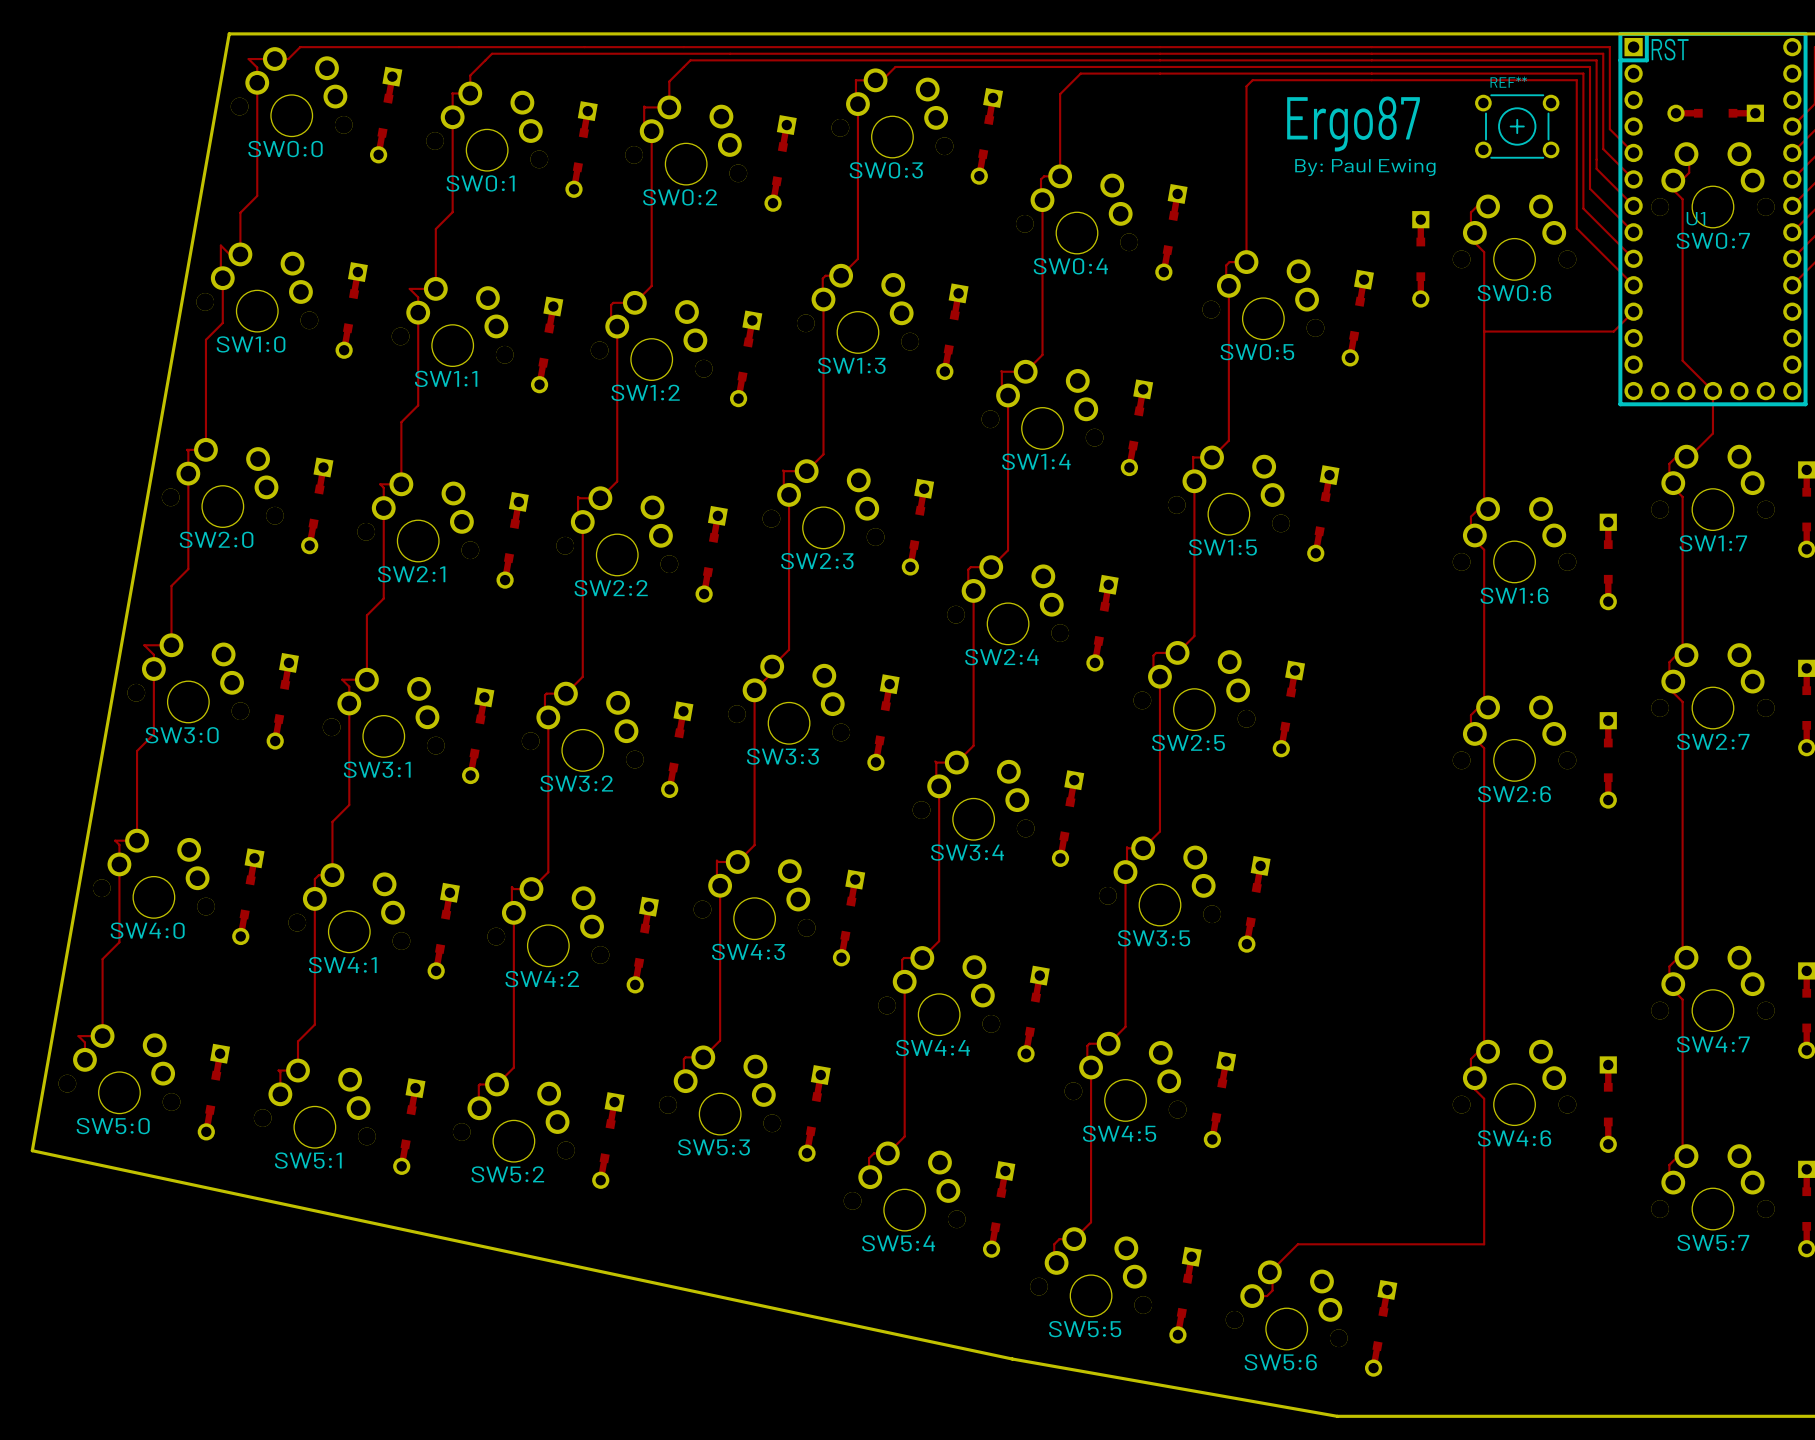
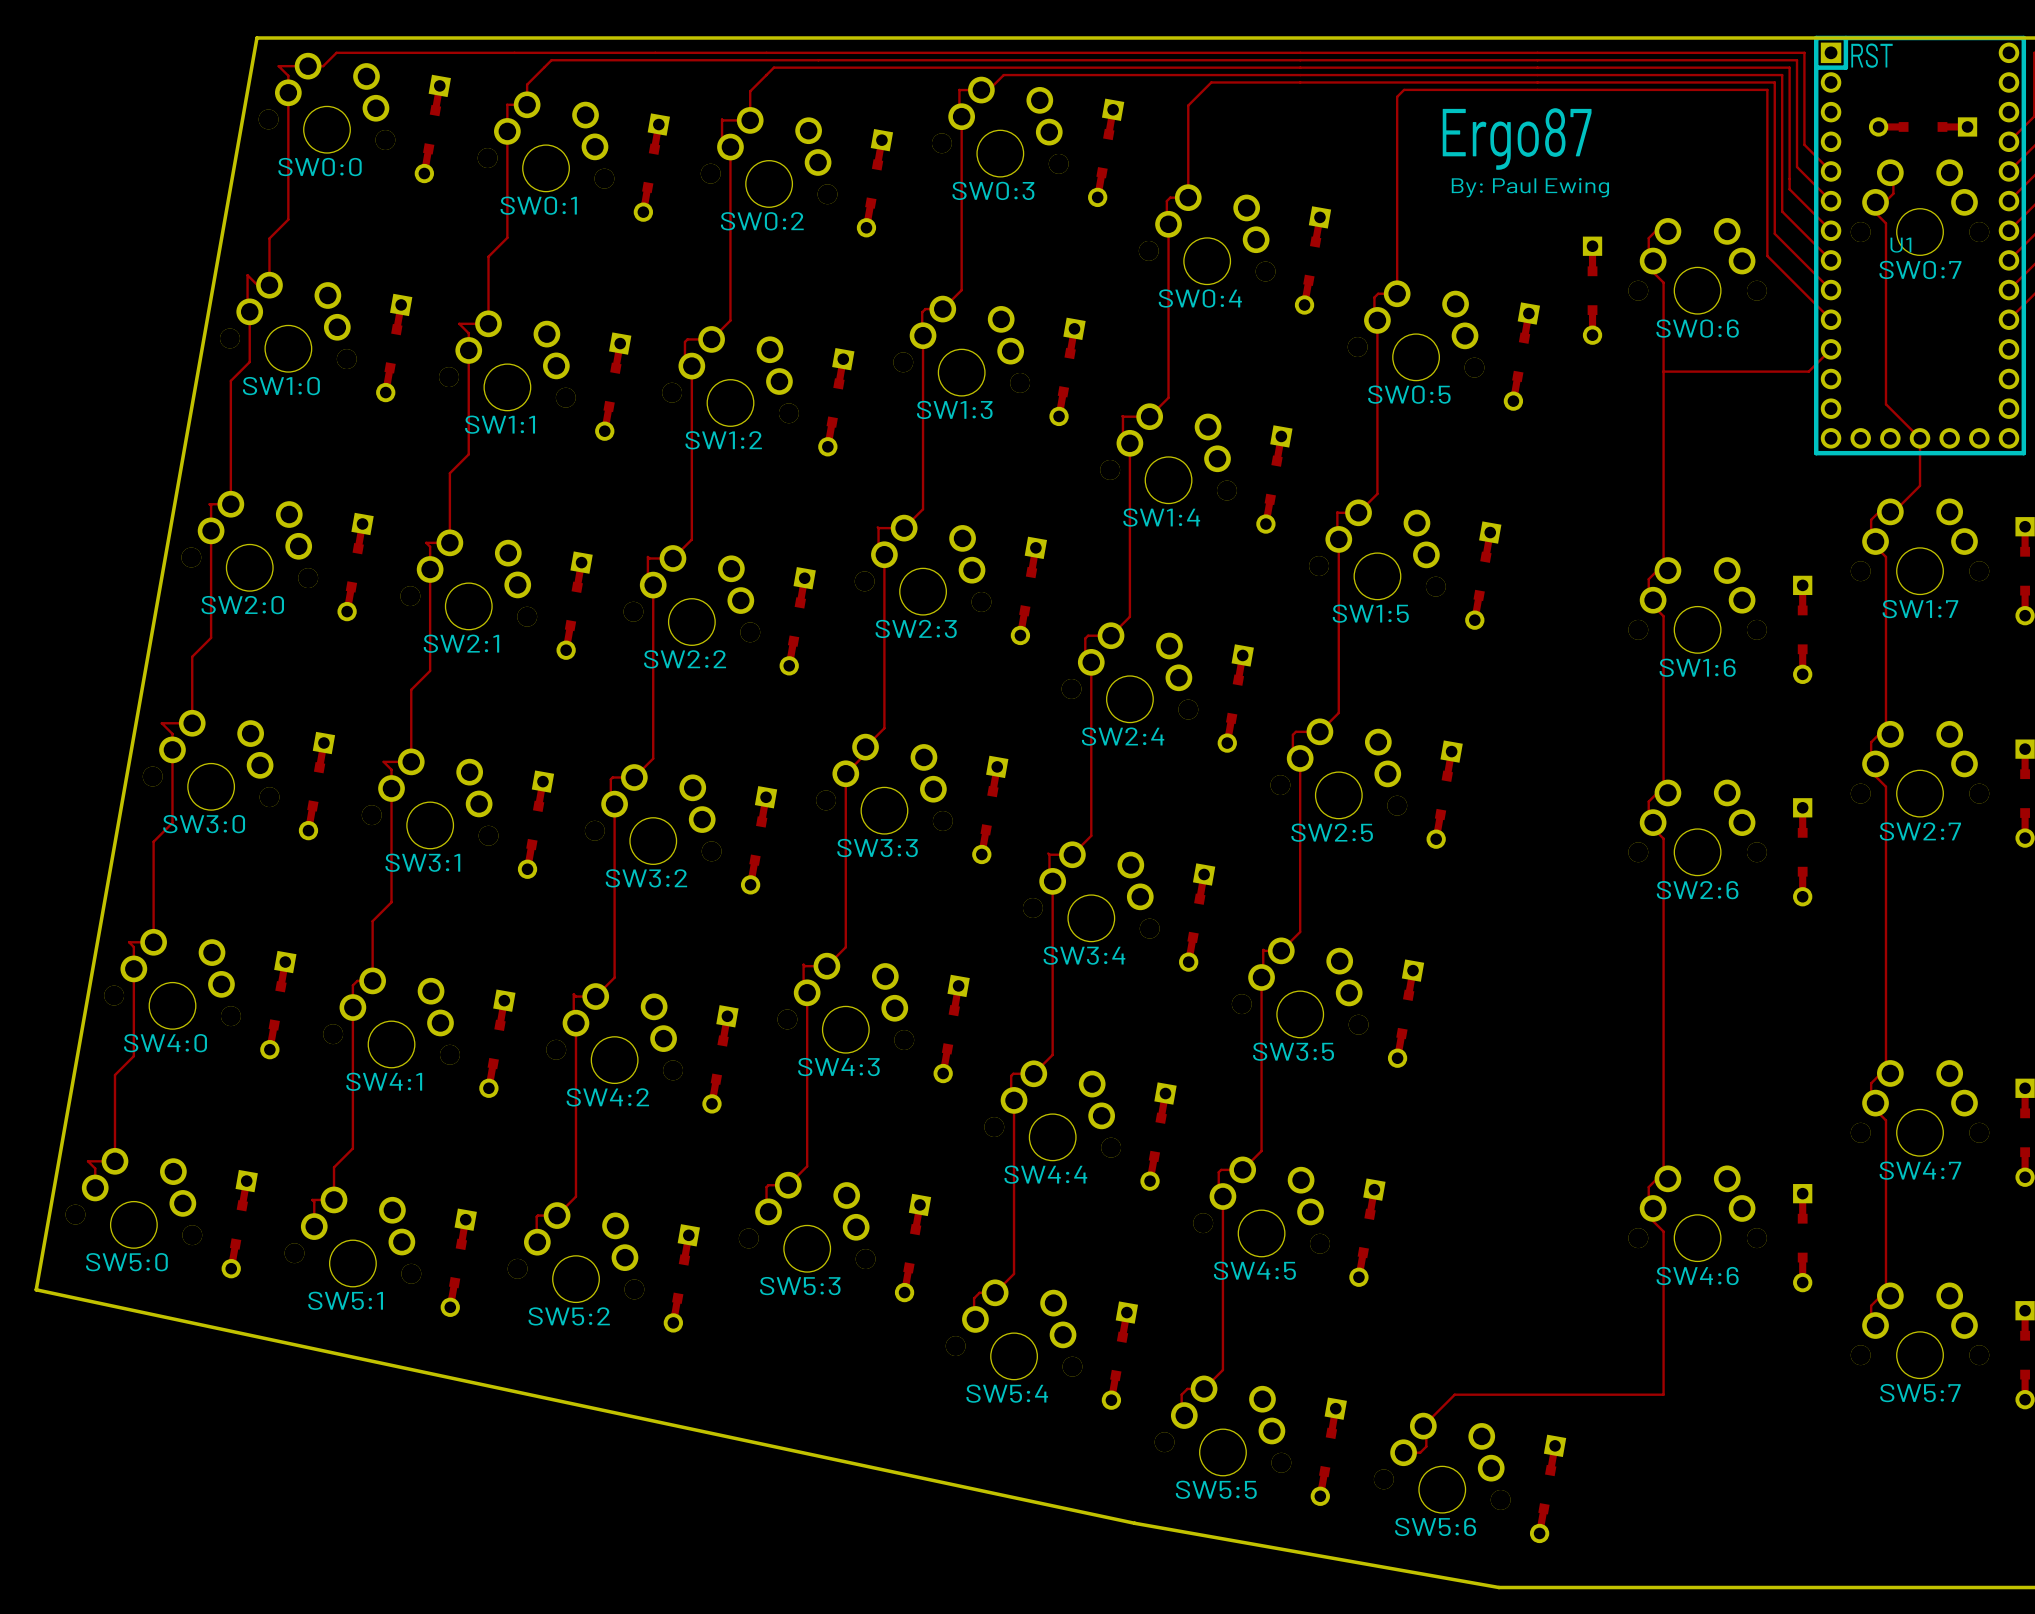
REF**: (1517, 126) -> none

